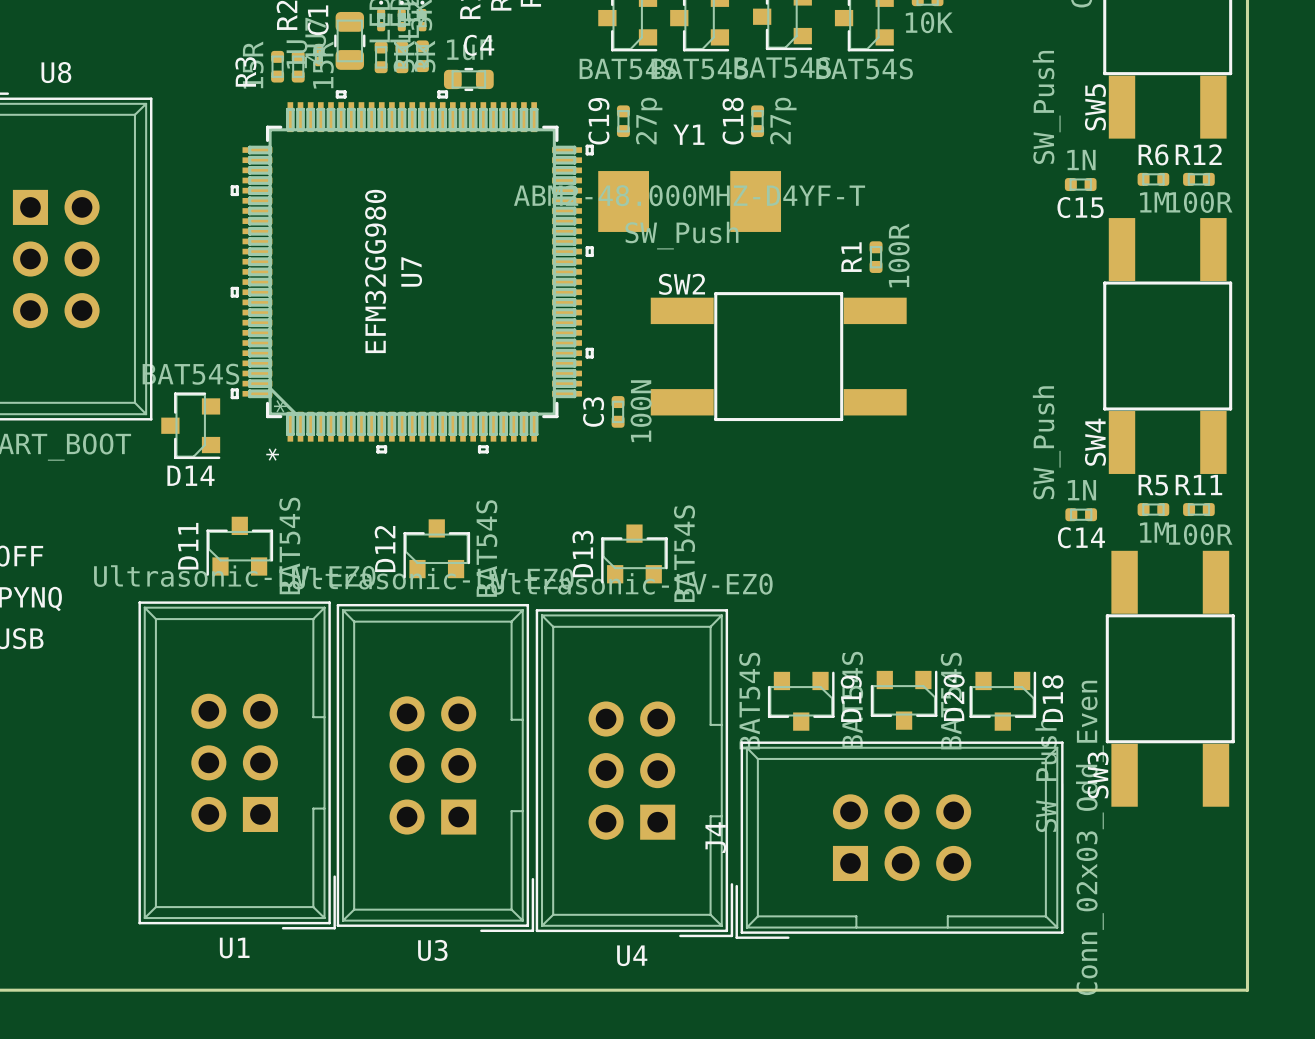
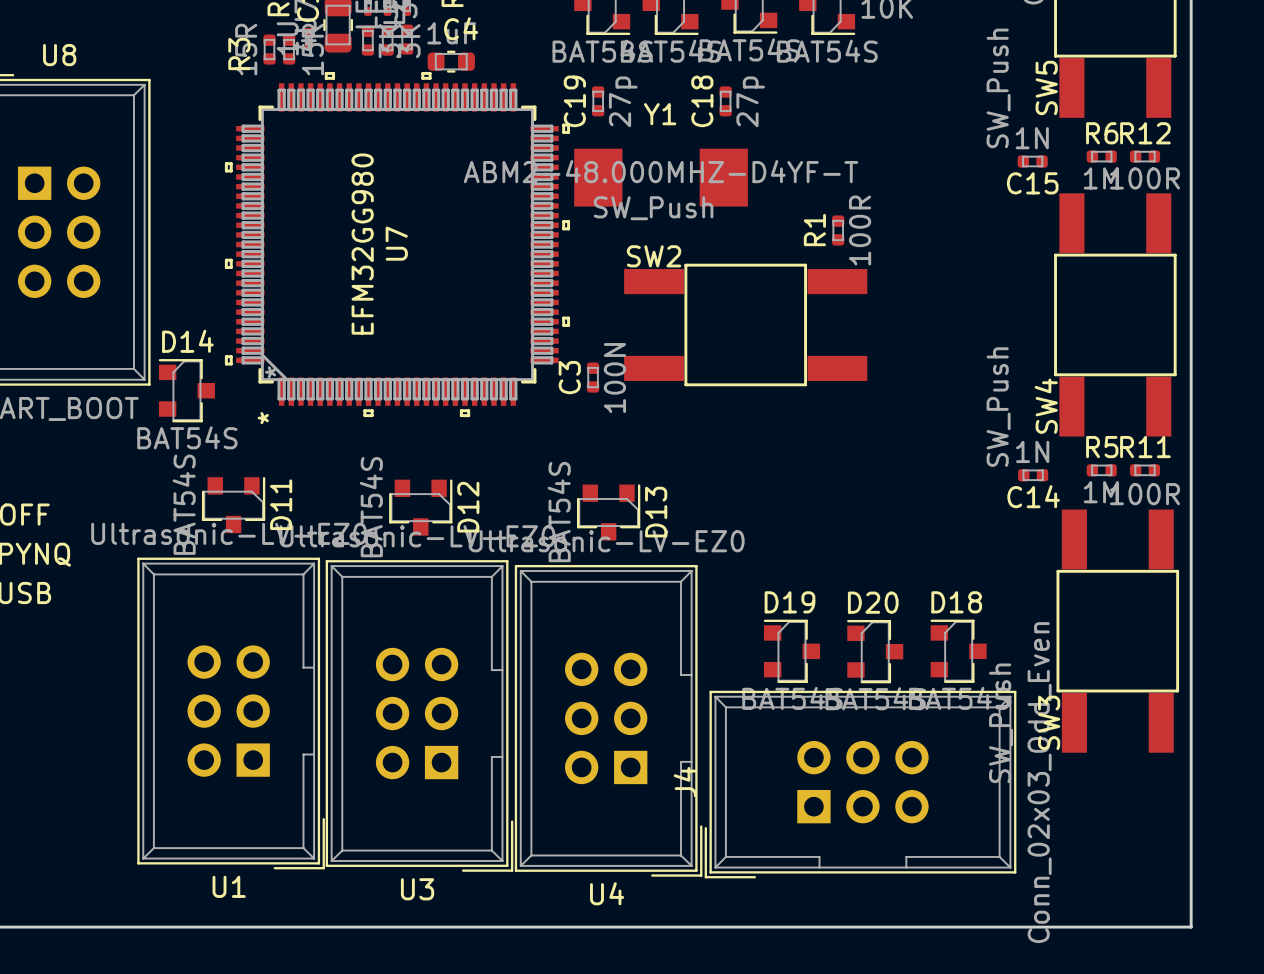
D14 rotation: 0° (190, 425) -> 180° (186, 390)
D11 rotation: 0° (239, 546) -> 180° (233, 505)
D12 rotation: 0° (436, 548) -> 180° (420, 507)
D13 rotation: 0° (634, 554) -> 180° (608, 512)
D20 rotation: 0° (904, 700) -> 90° counterclockwise (875, 651)
D19 rotation: 0° (801, 701) -> 90° counterclockwise (791, 651)
D18 rotation: 0° (1002, 701) -> 90° counterclockwise (958, 651)

